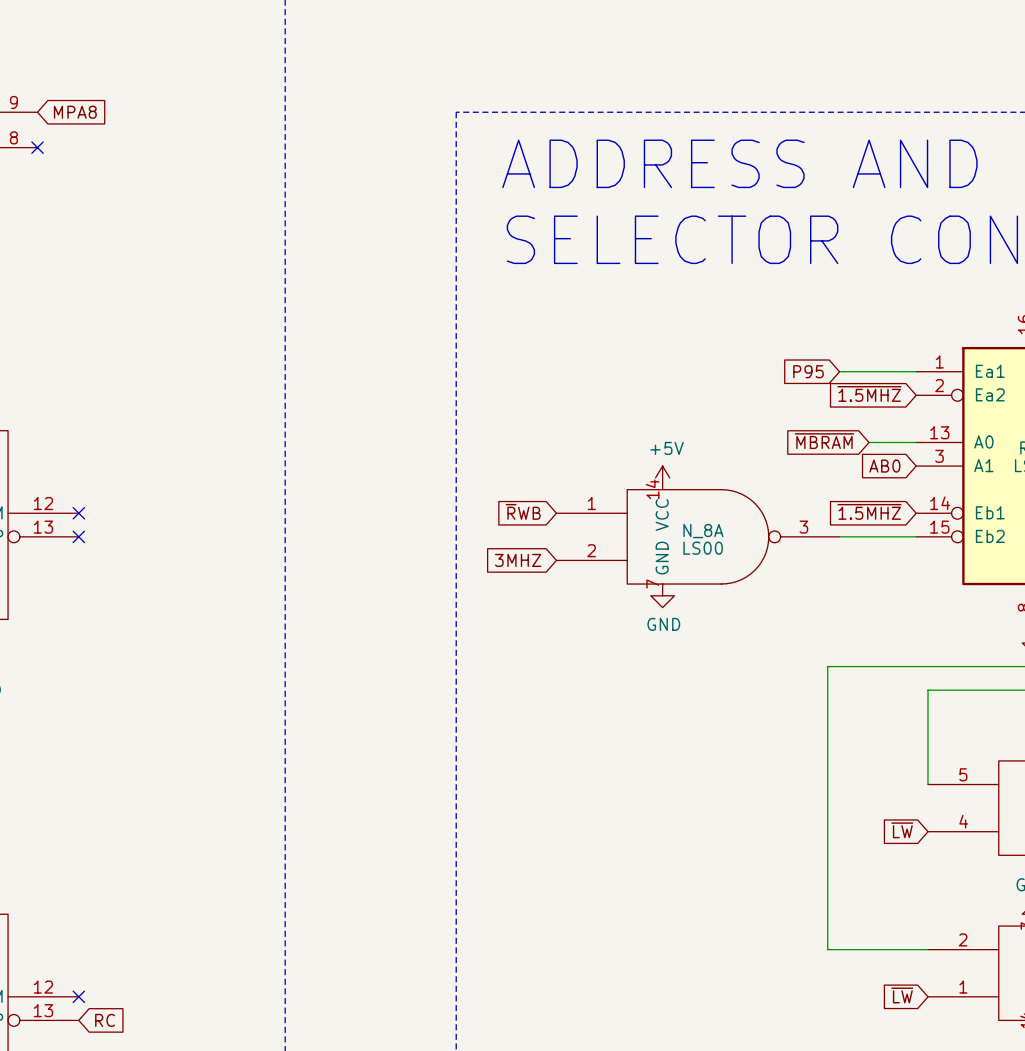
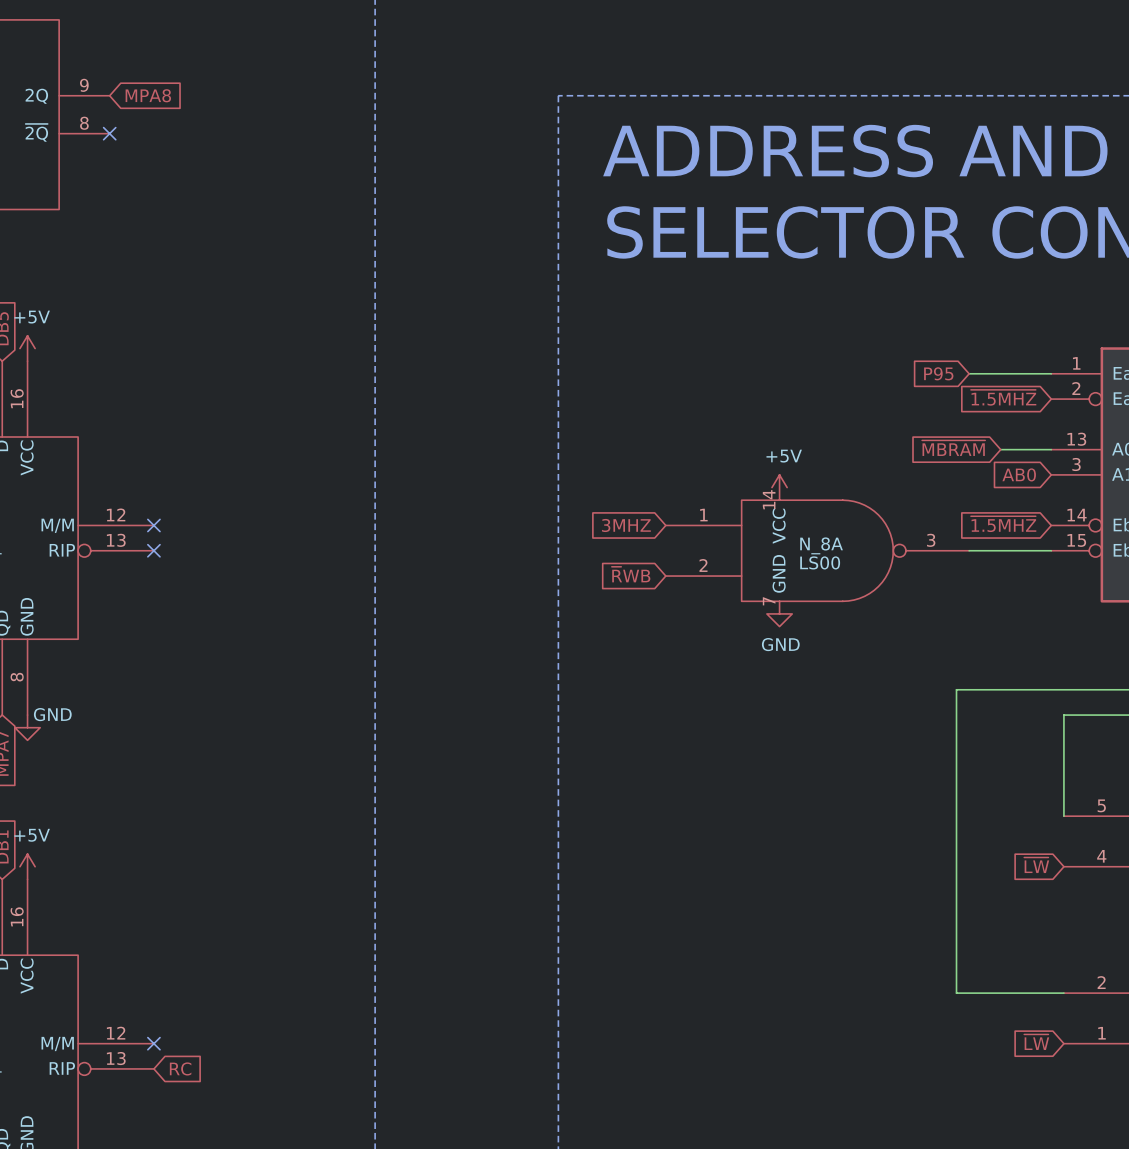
global label: ~{R}WB (523, 511) -> 3MHZ (626, 525)
global label: 3MHZ (518, 560) -> ~{R}WB (631, 574)

